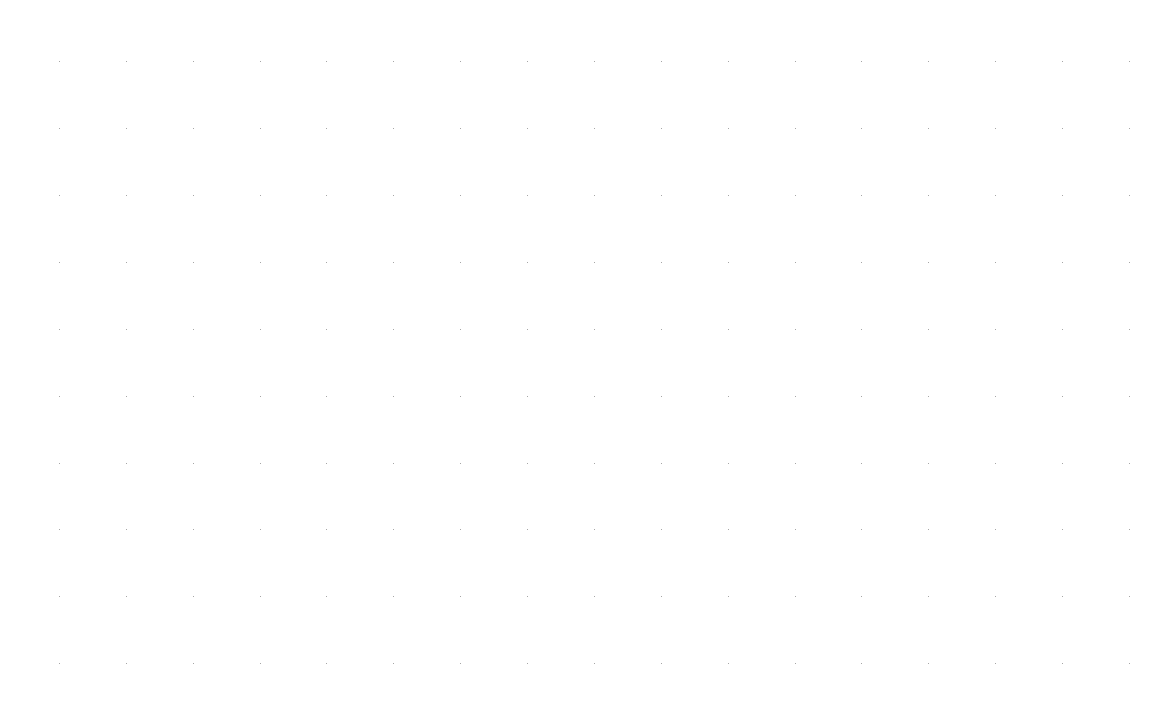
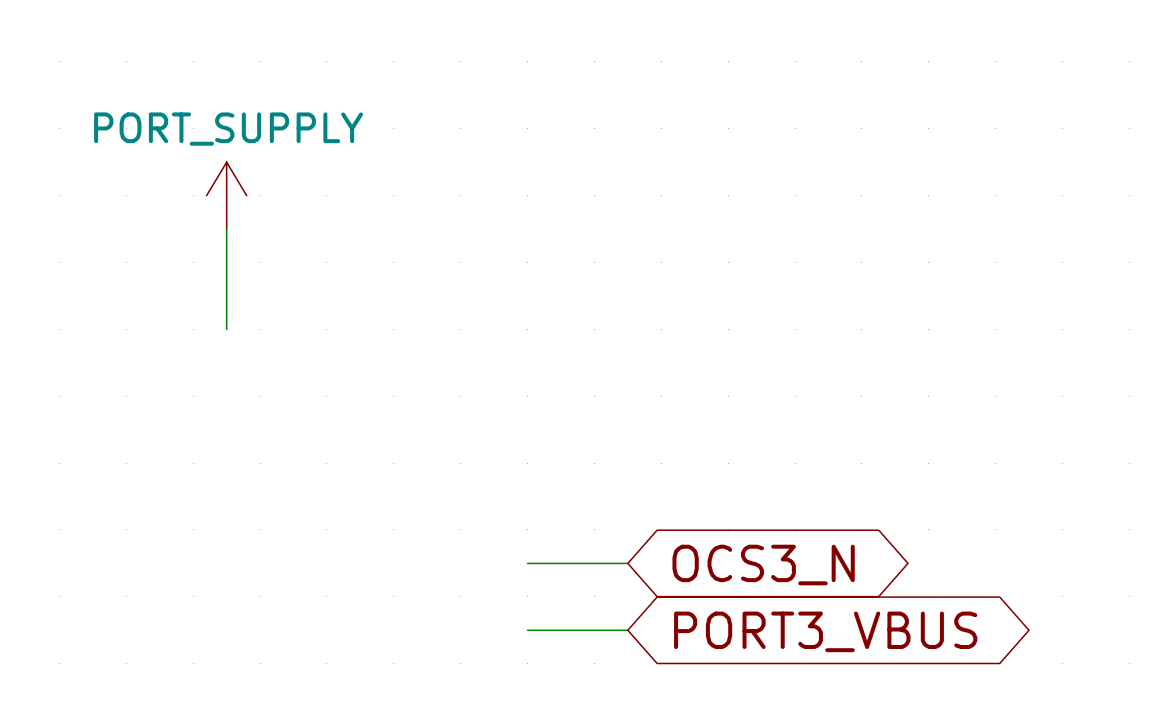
power symbol: none -> PORT_SUPPLY (226, 195)
wire: none -> (226, 229) (226, 329)
wire: none -> (527, 563) (627, 563)
global label: none -> OCS3_N (763, 565)
wire: none -> (527, 630) (627, 630)
global label: none -> PORT3_VBUS (825, 631)

